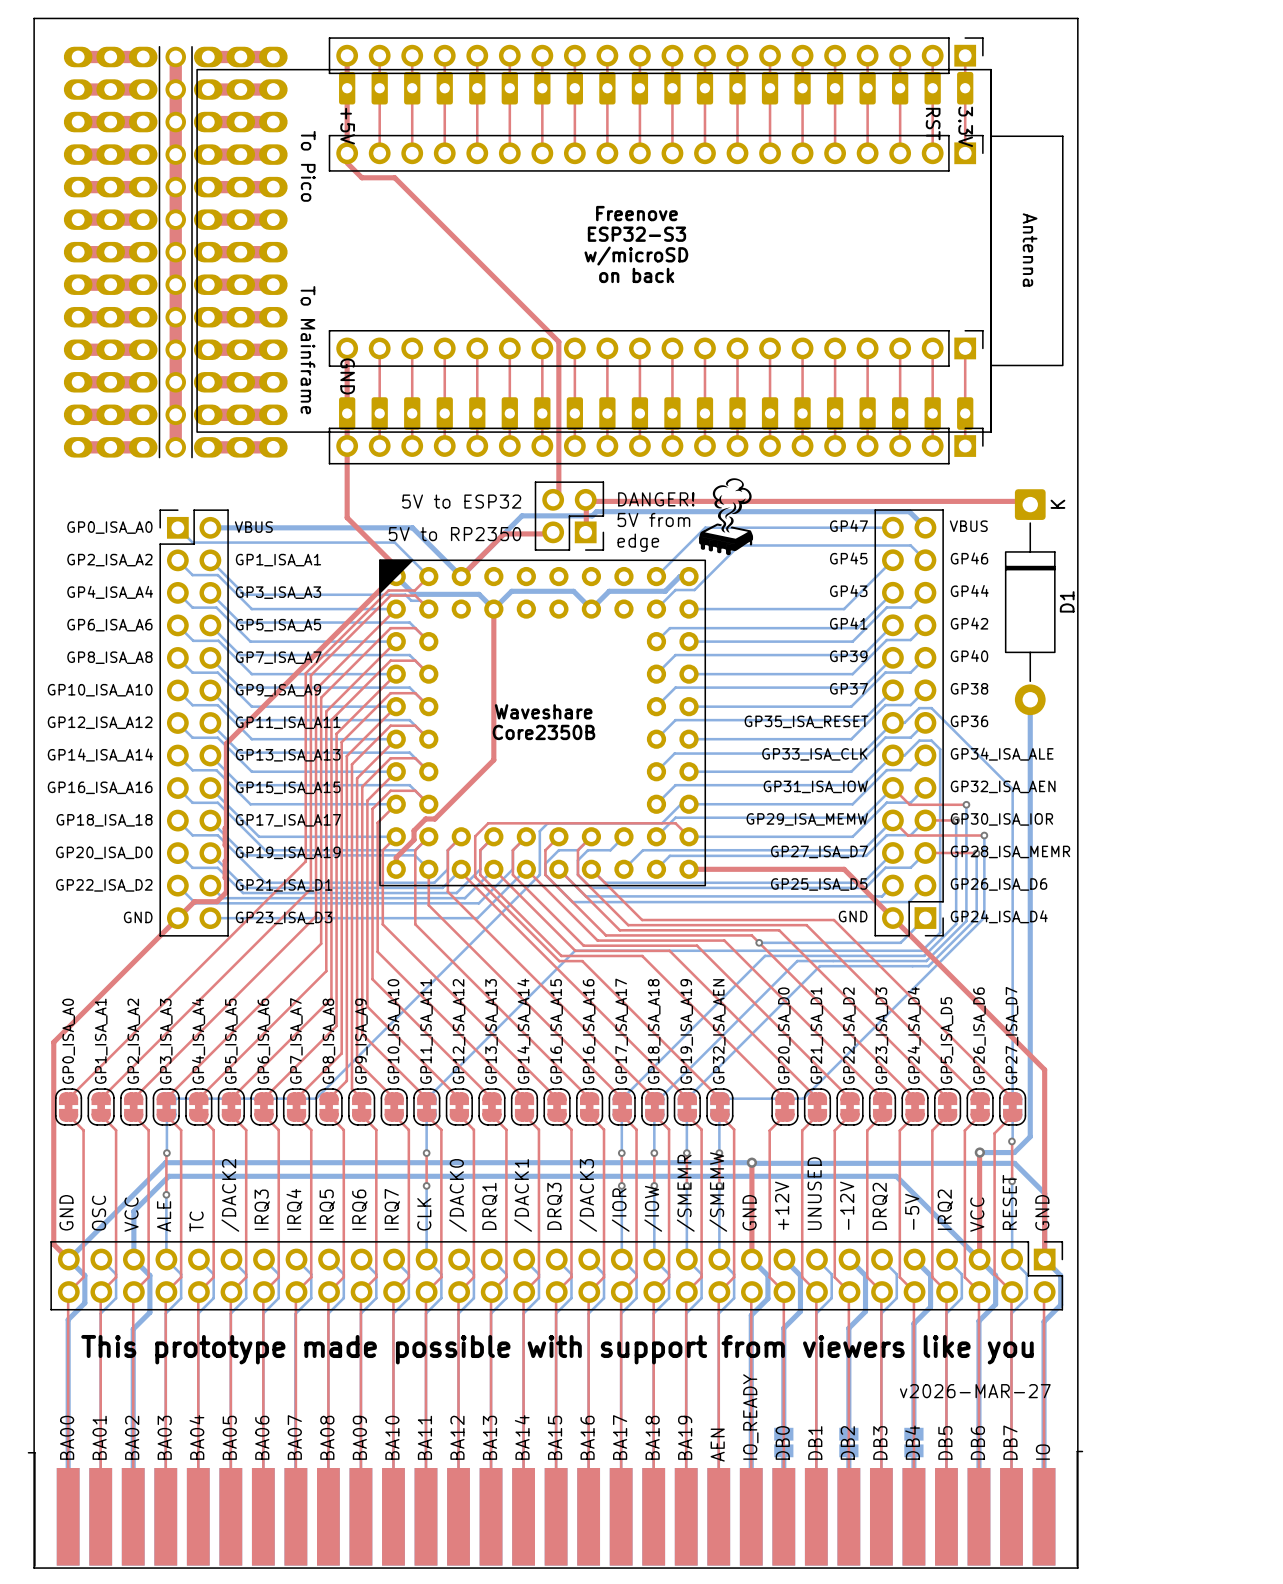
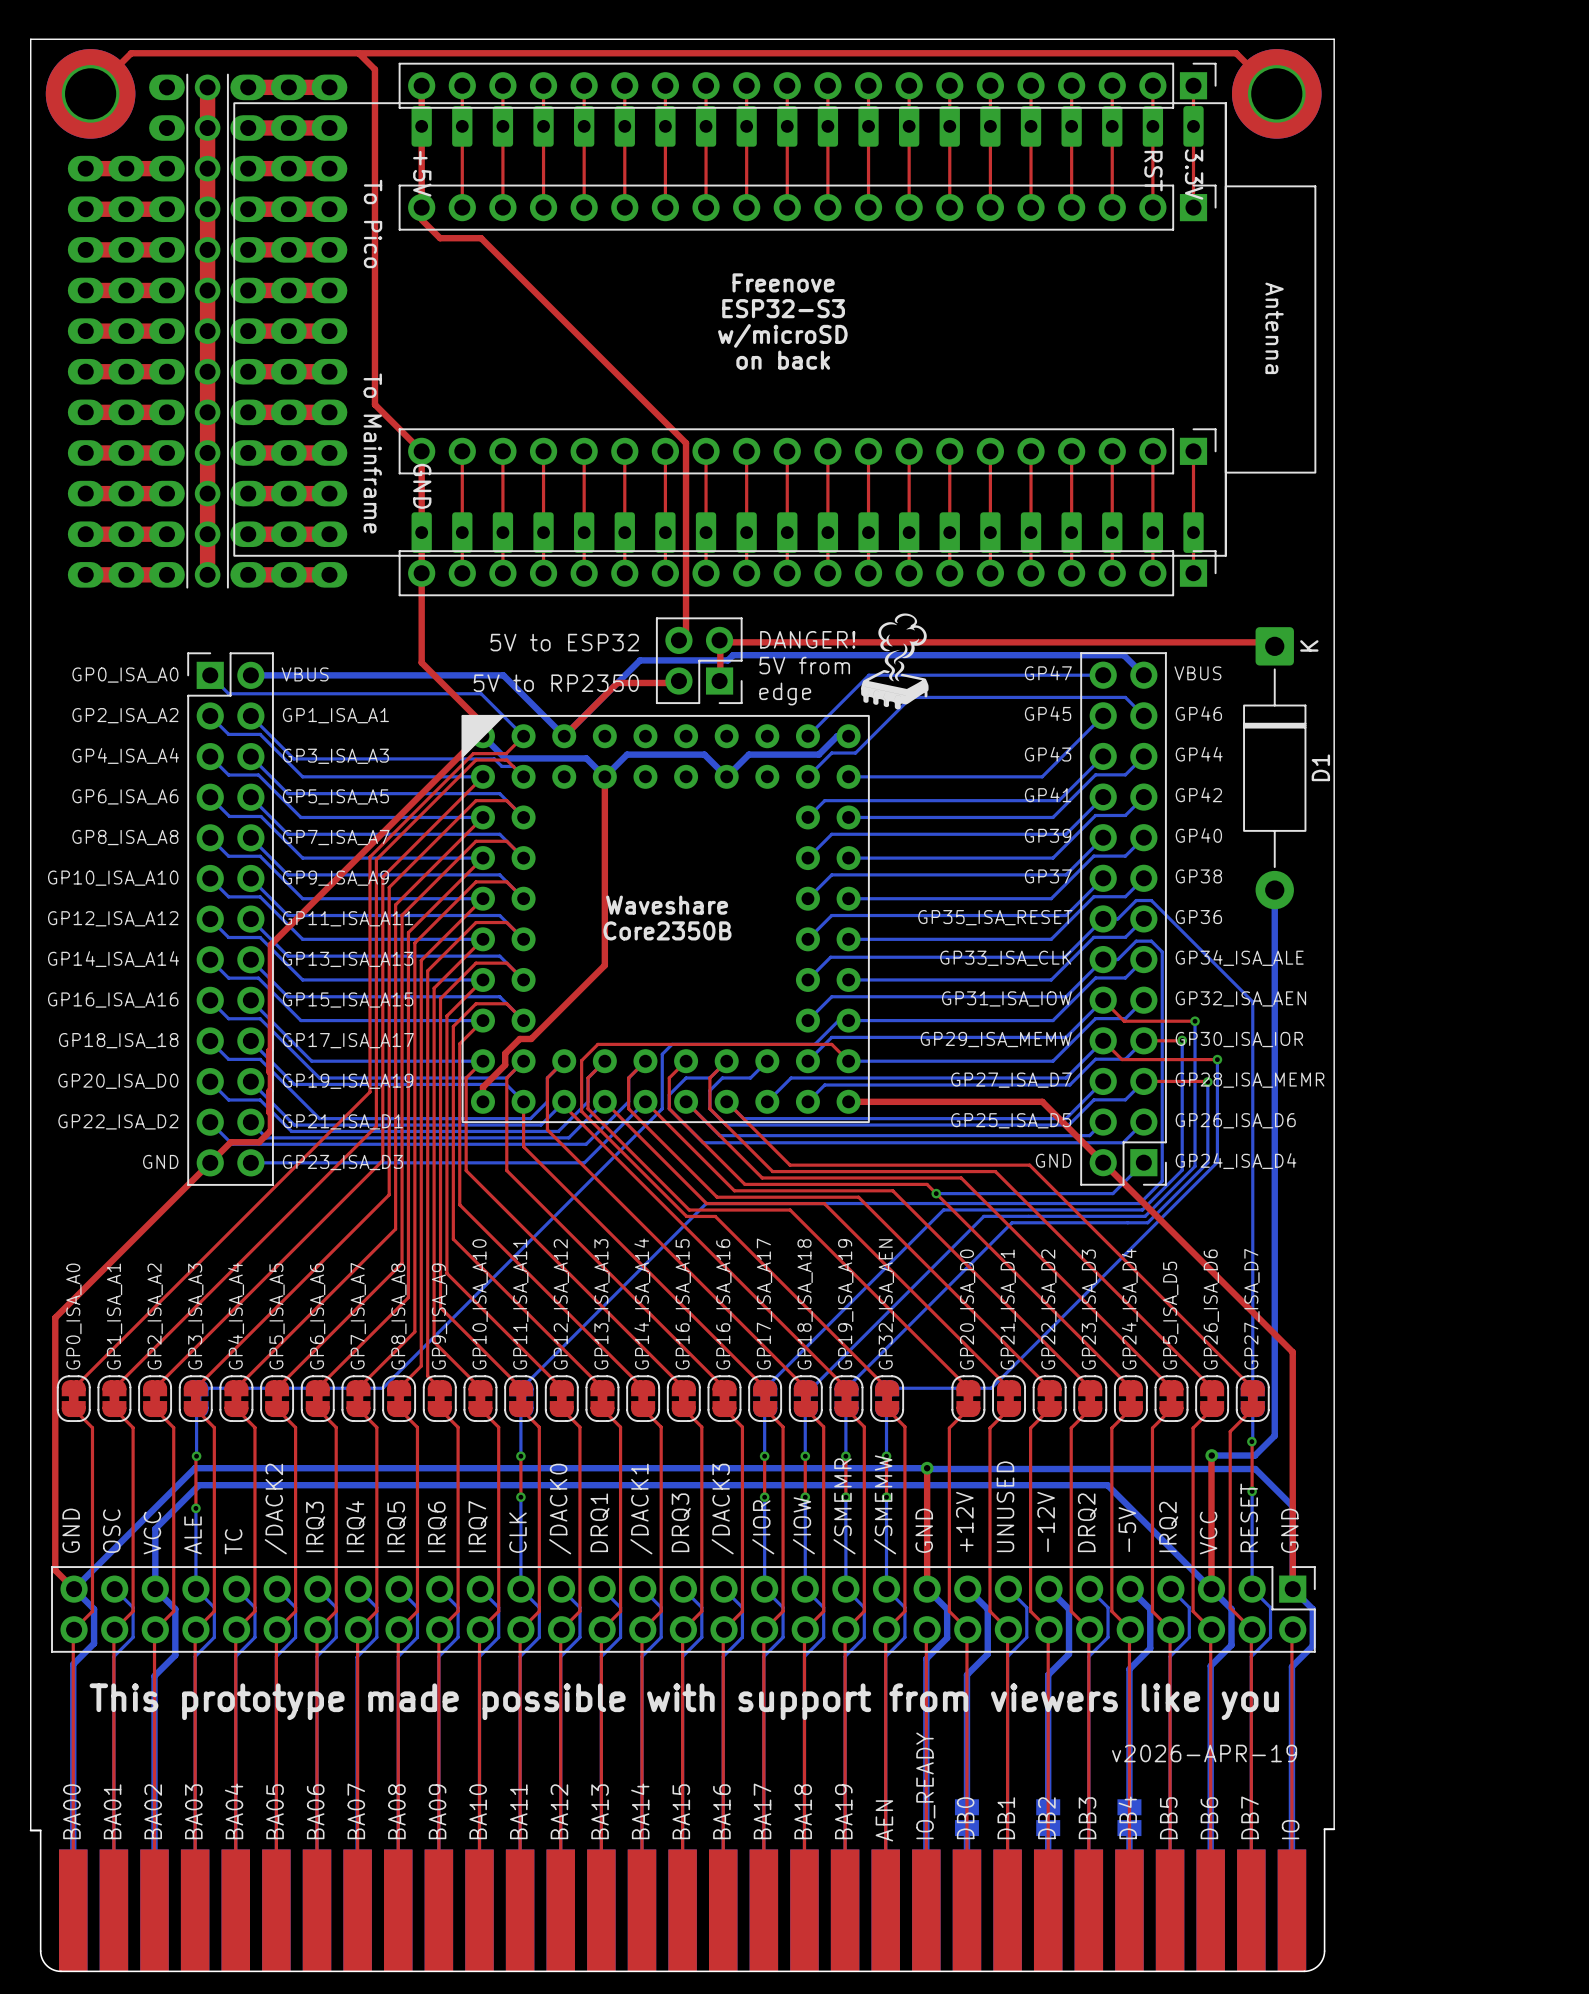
top track: none -> (358, 53) (374, 69) (374, 404) (421, 451)
top track: none -> (115, 68) (131, 53) (1236, 53) (1251, 68)
part footprint: [63, 45, 288, 459] -> [67, 73, 348, 589]
part: none -> (90, 93)
part: none -> (1276, 93)
text: v2026-MAR-27 (975, 1391) -> v2026-APR-19 (1204, 1753)
part footprint: [27, 1450, 1084, 1567] -> [39, 1828, 1326, 1973]
board edge: none -> (1324, 1829) (1334, 1829)
board edge: (1077, 1451) (1077, 1568) (34, 1568) (34, 1452) -> (40, 1830) (30, 1830)

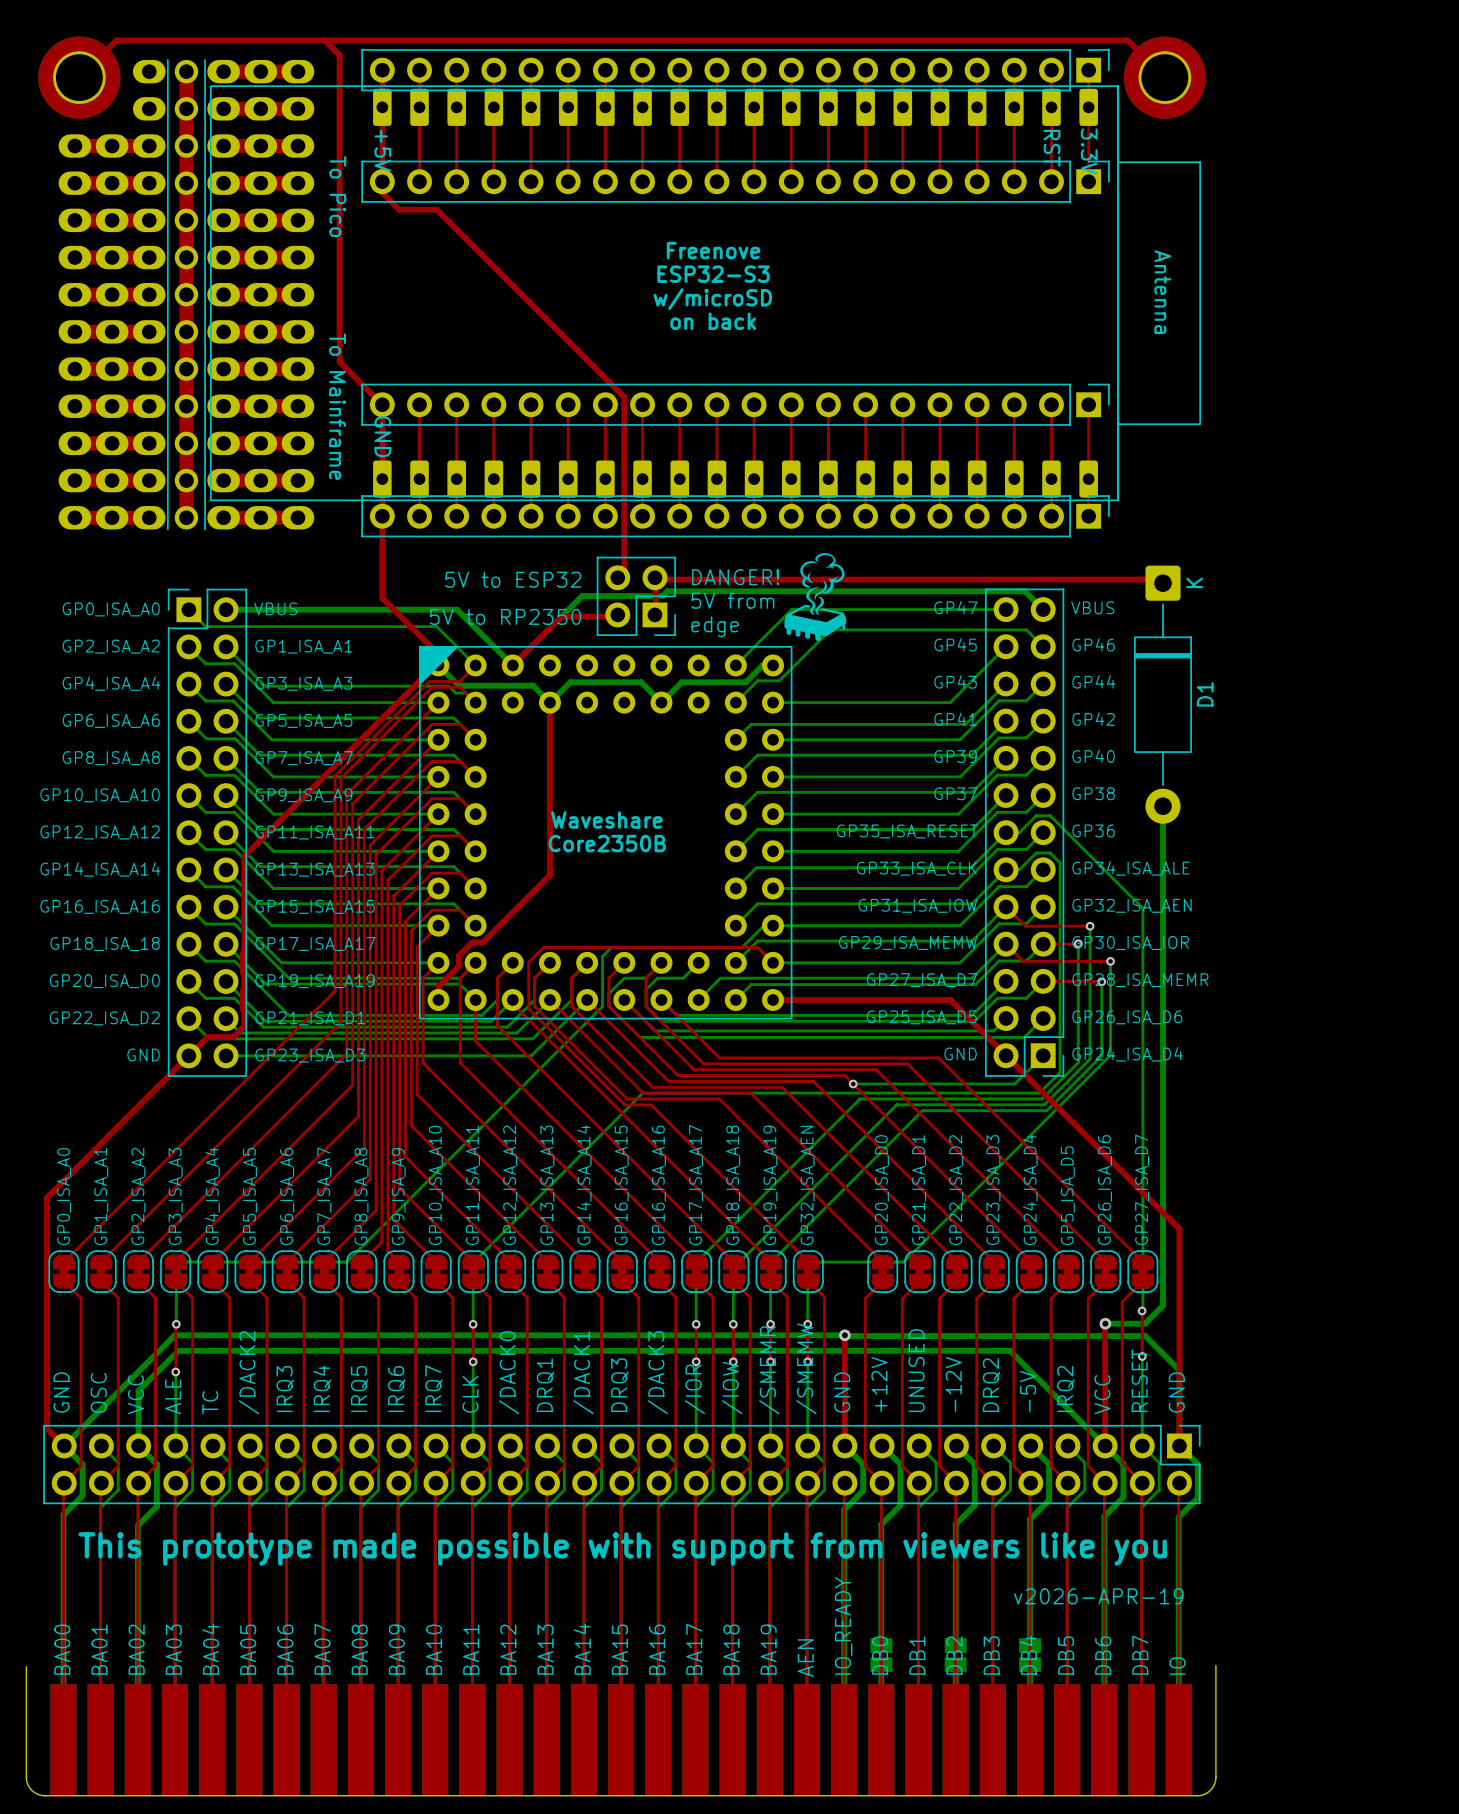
part footprint: [39, 1828, 1326, 1973] -> [25, 1664, 1217, 1797]
board edge: (1324, 1829) (1334, 1829) (1334, 39) (30, 39) (30, 1830) (40, 1830) -> none

